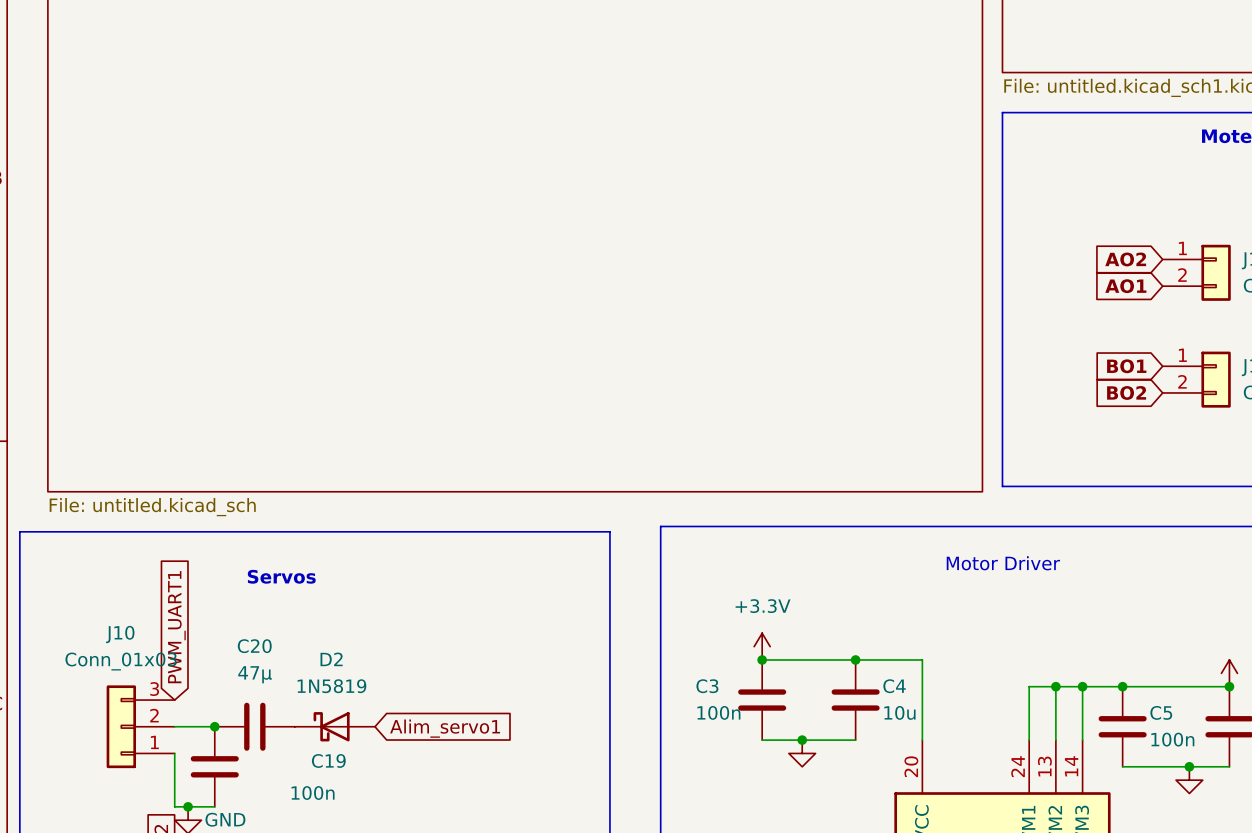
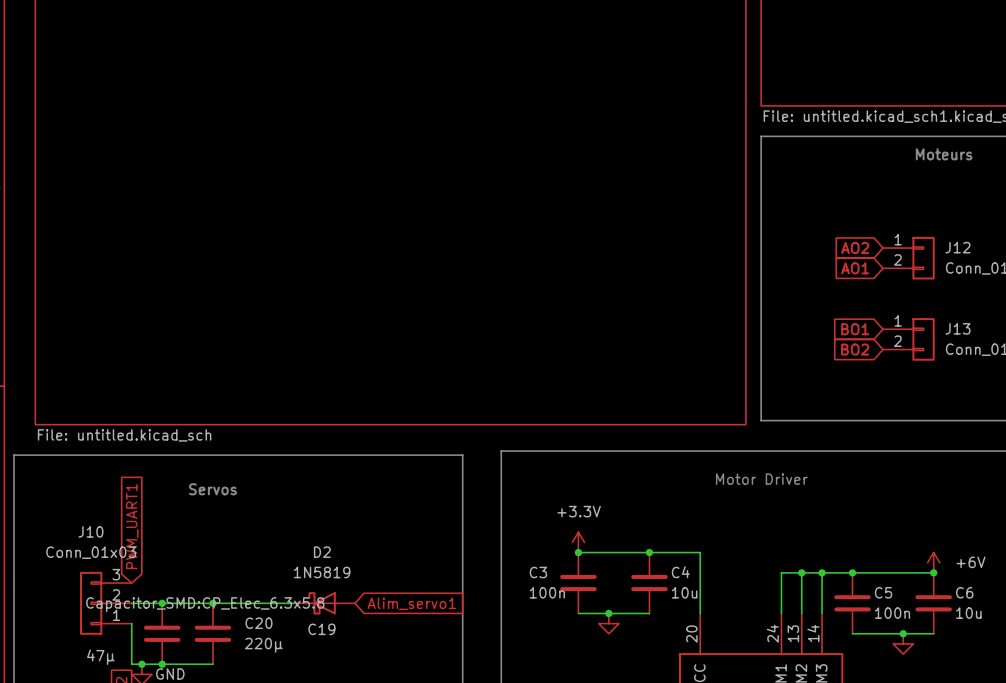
C20 name position: C20 (254, 646) -> C20 (258, 623)
C20 value: 47µ (255, 674) -> 220µ (263, 645)
C20 rotation: 0° (254, 726) -> 90° clockwise (212, 633)
C20 position: (254, 726) -> (212, 633)
junction: none -> (212, 603)
D2 position: (334, 726) -> (324, 603)
C20 text: none -> Capacitor_SMD:CP_Elec_6.3x5.8 (205, 604)
global label position: Alim_servo1 (445, 728) -> Alim_servo1 (411, 603)
C19 name position: C19 (328, 760) -> C19 (321, 629)
C19 value: 100n (313, 793) -> 47µ (100, 657)
wire: none -> (162, 664) (212, 664)
junction: none -> (162, 664)

